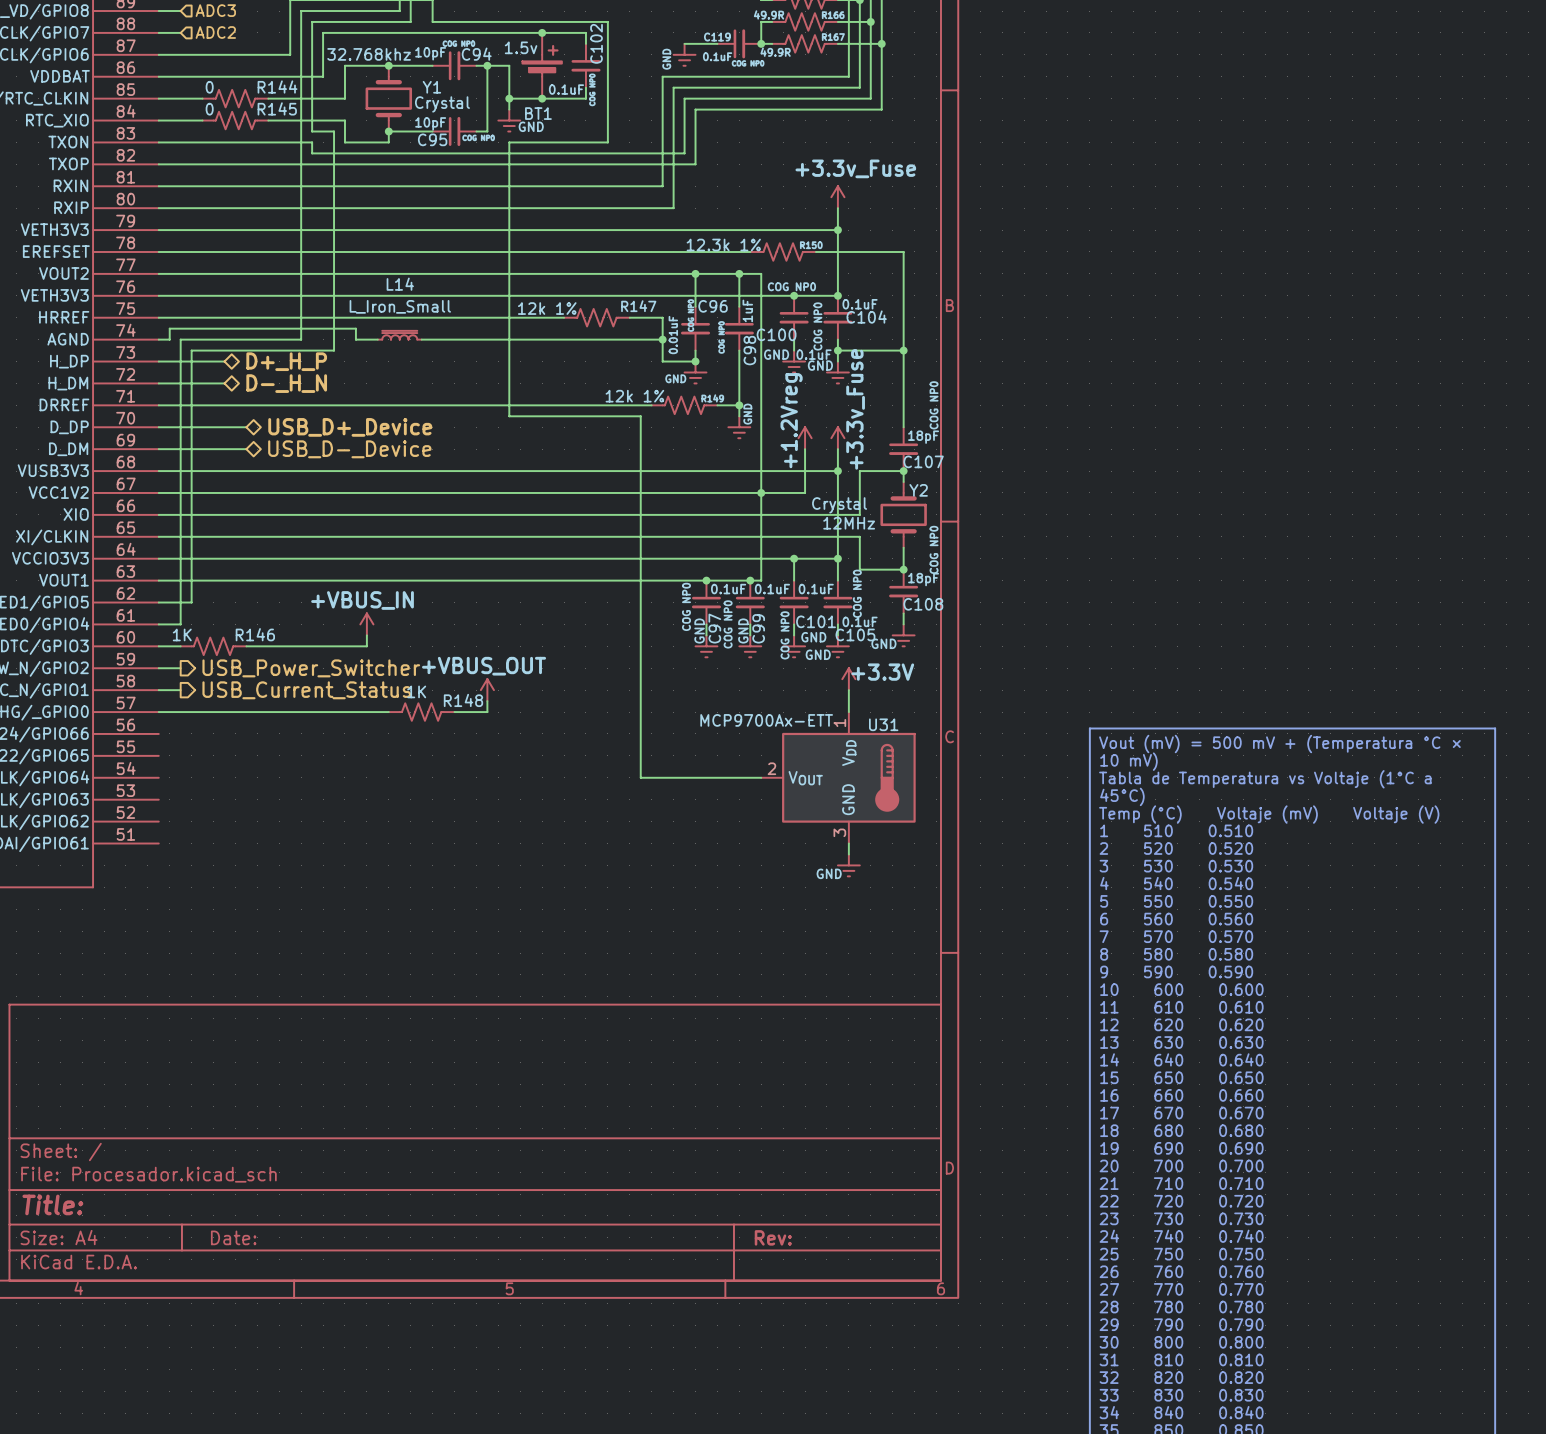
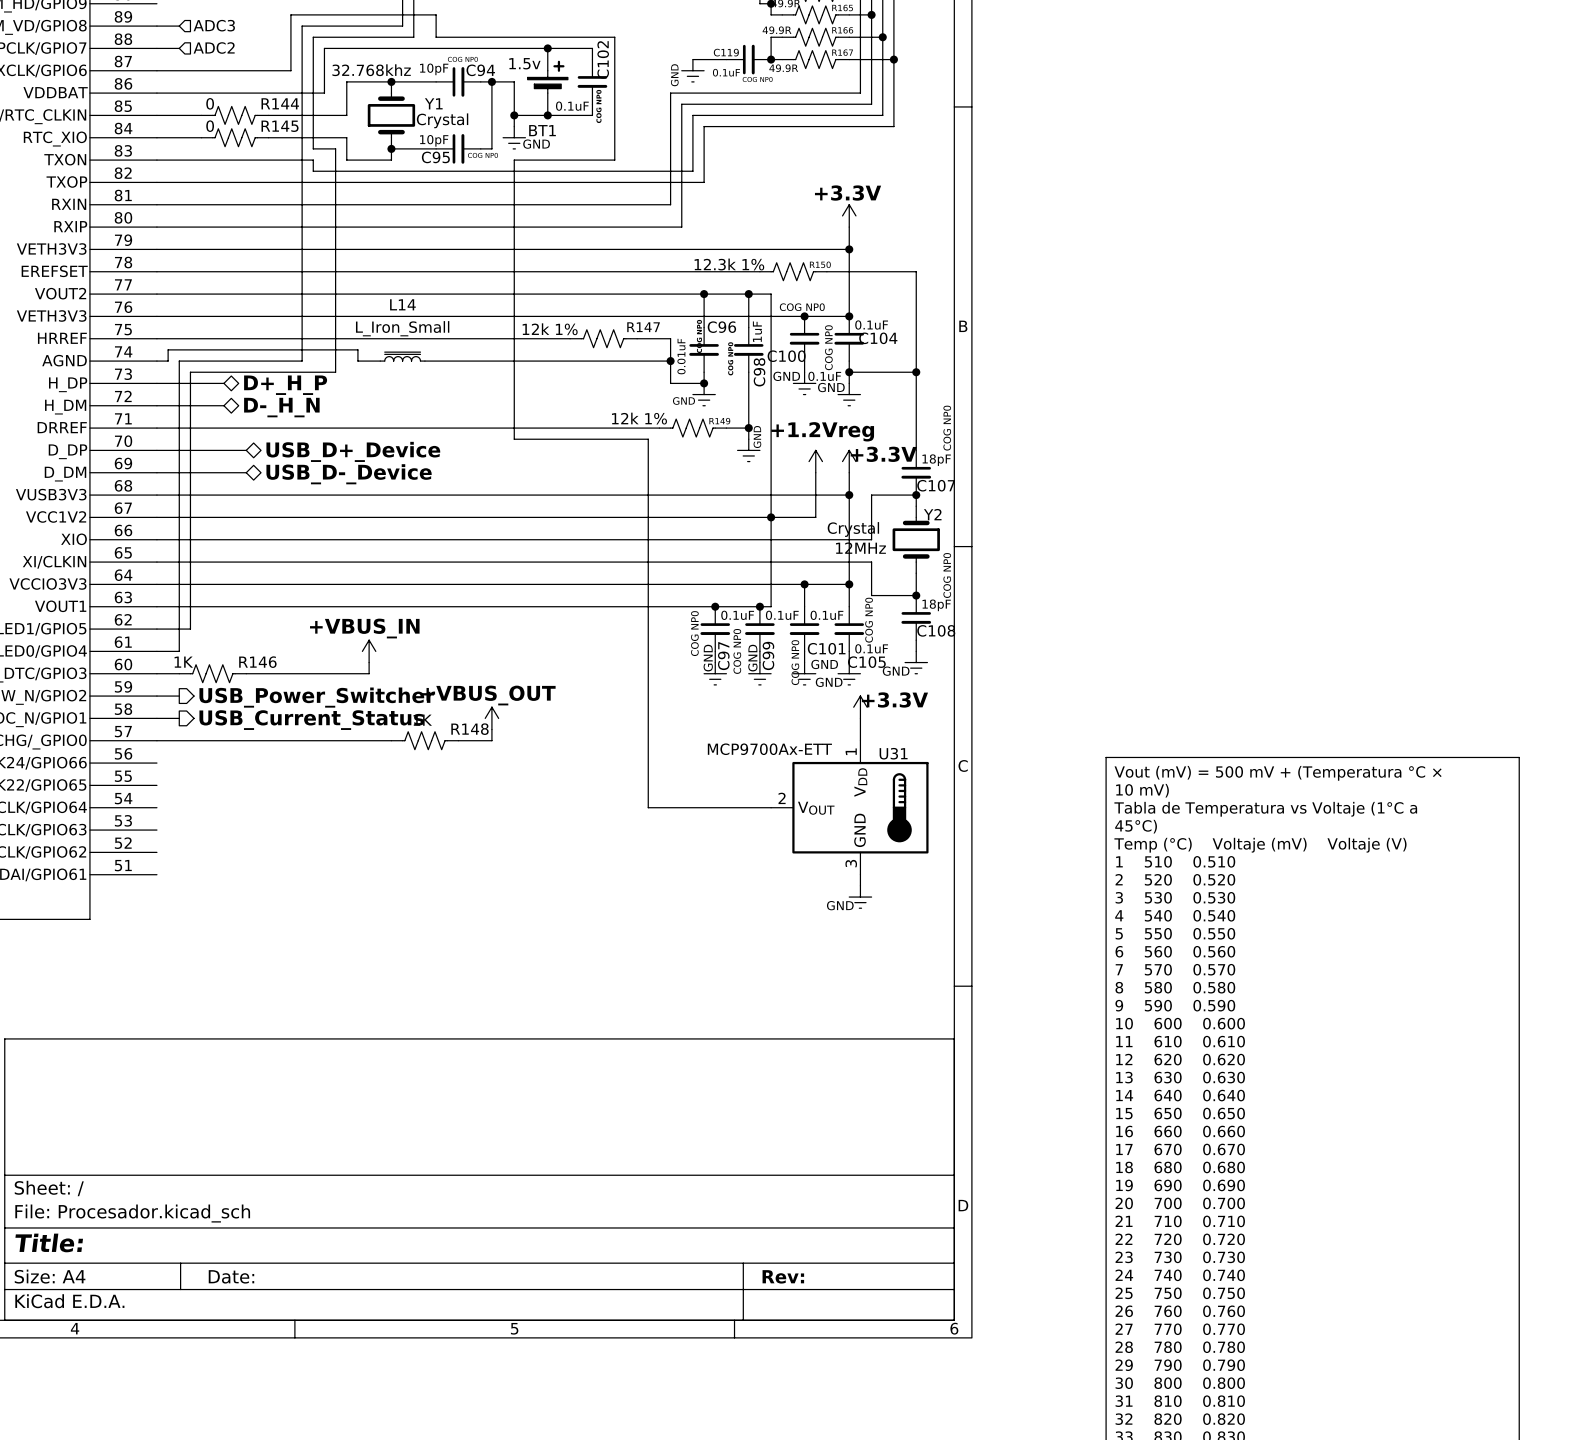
power symbol: +3.3v_Fuse (837, 197) -> +3.3V (849, 215)
power symbol text rotation: 0° (791, 420) -> 90° clockwise (822, 431)
power symbol: +3.3v_Fuse (837, 438) -> +3.3V (849, 461)

